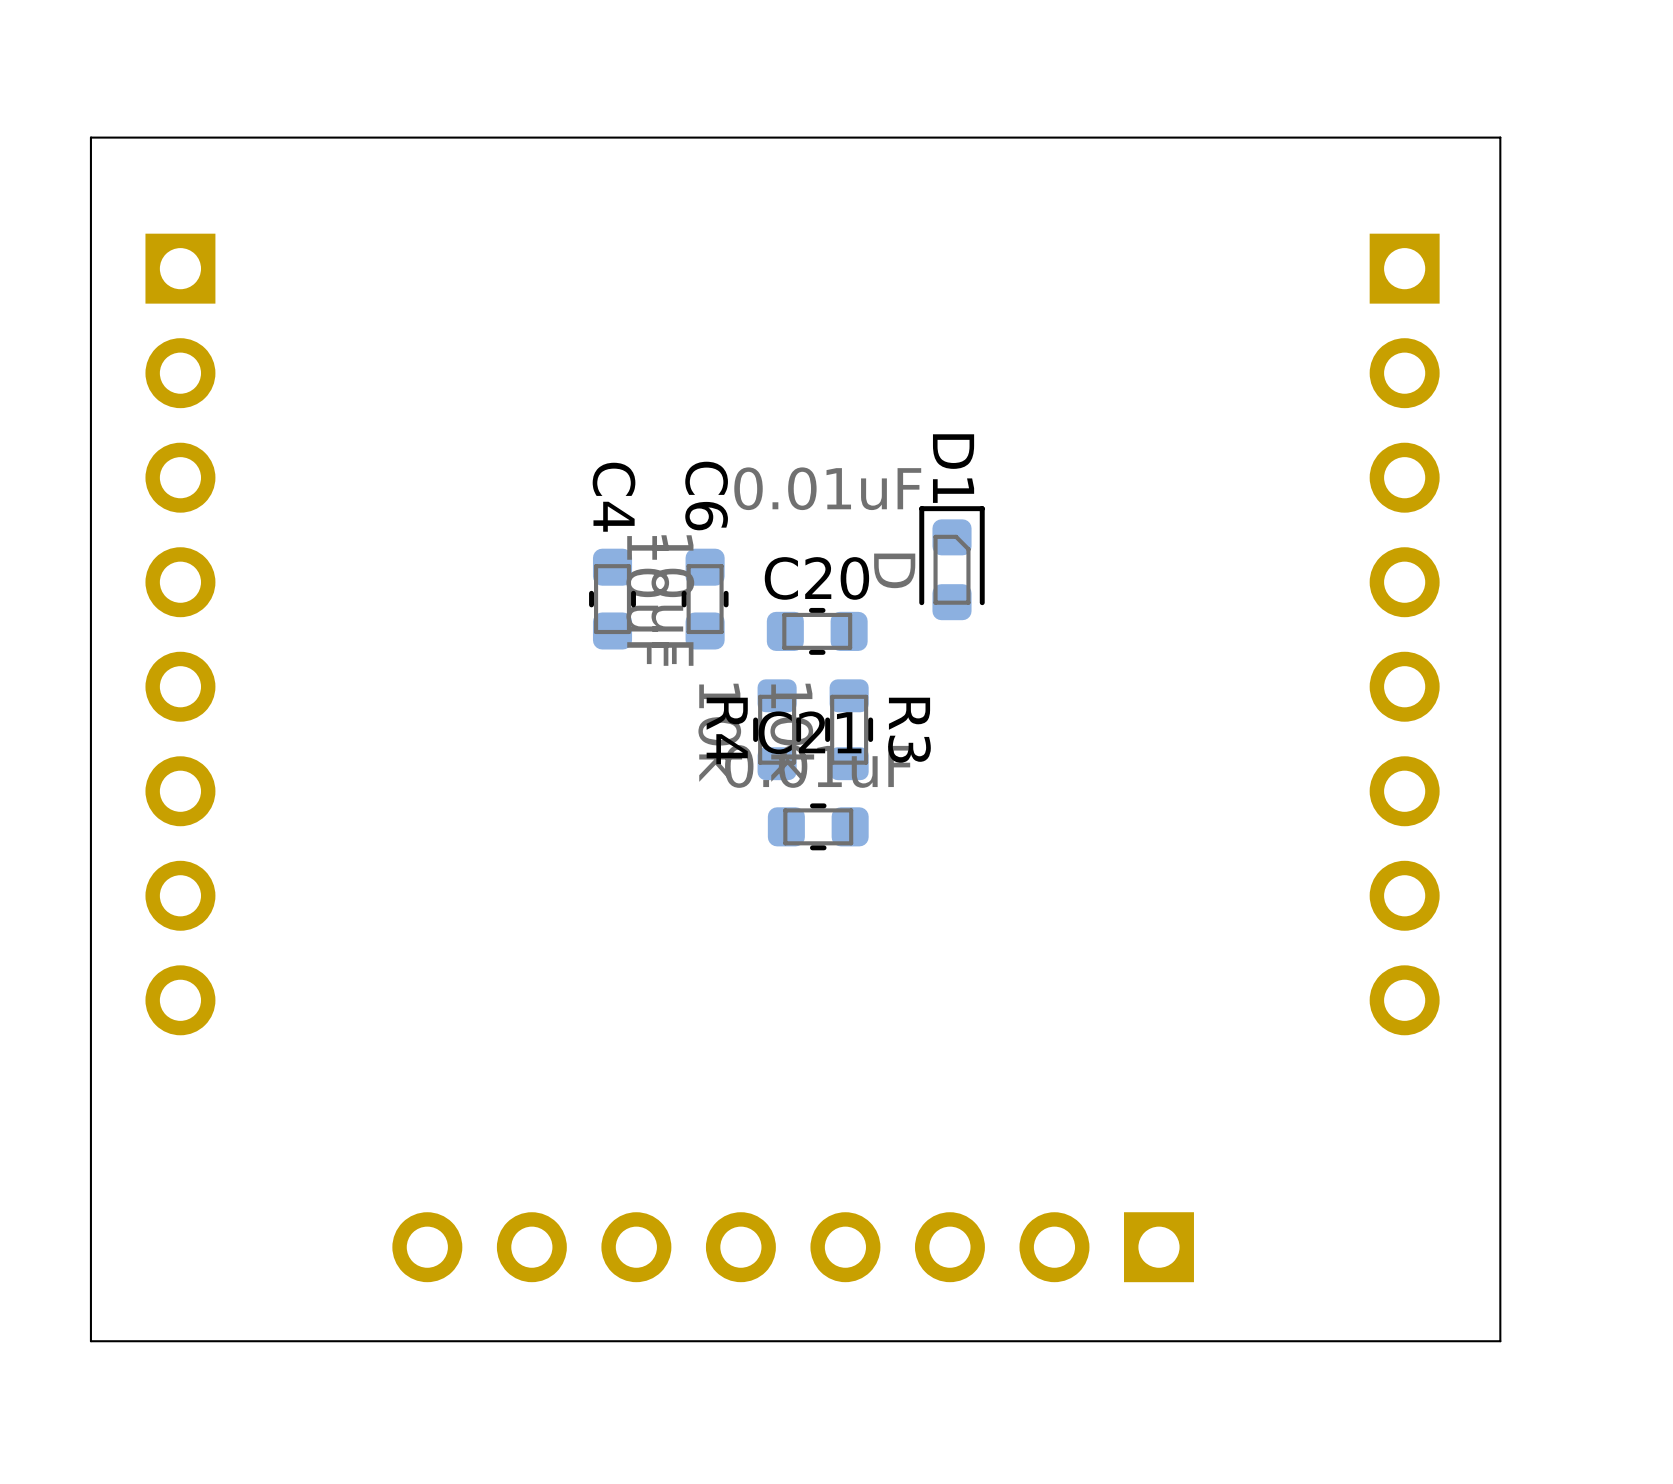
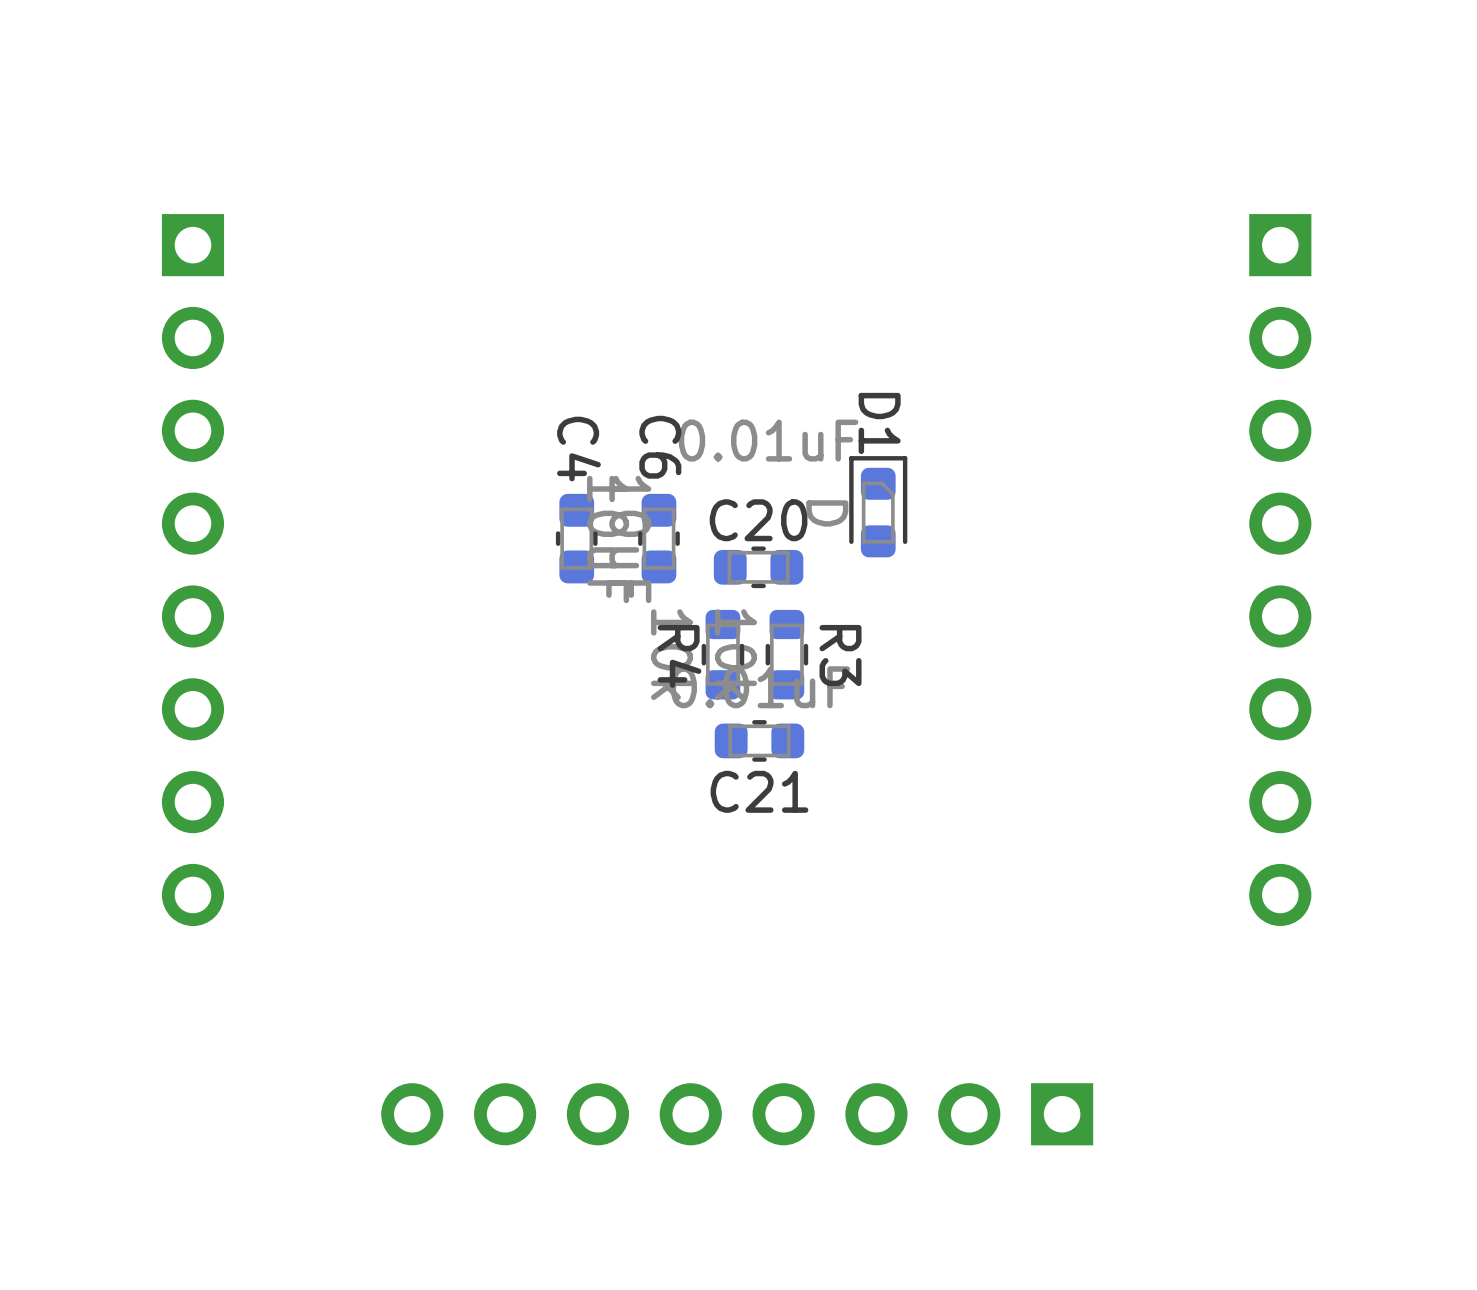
board edge: (1500, 137) (90, 137) (90, 1341) (1500, 1341) (1500, 137) -> none
C21 name position: C21 (810, 732) -> C21 (759, 791)

